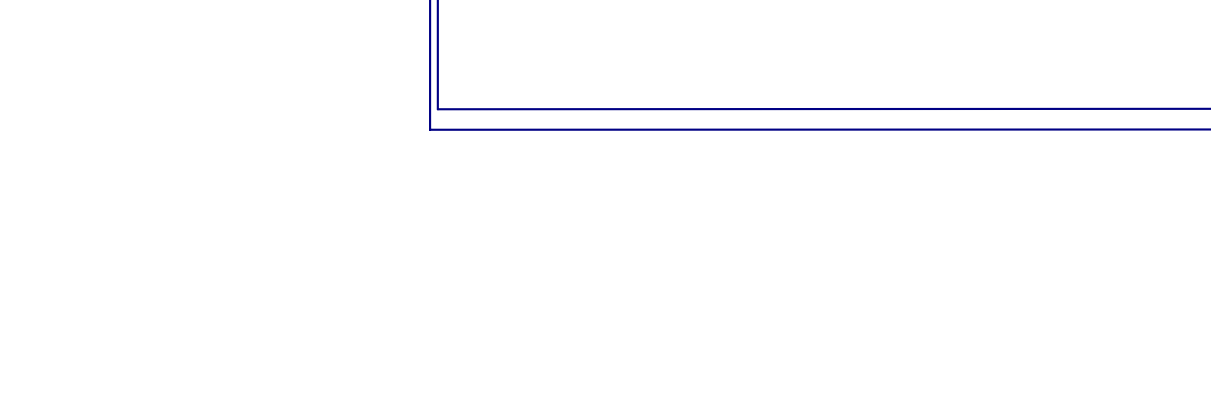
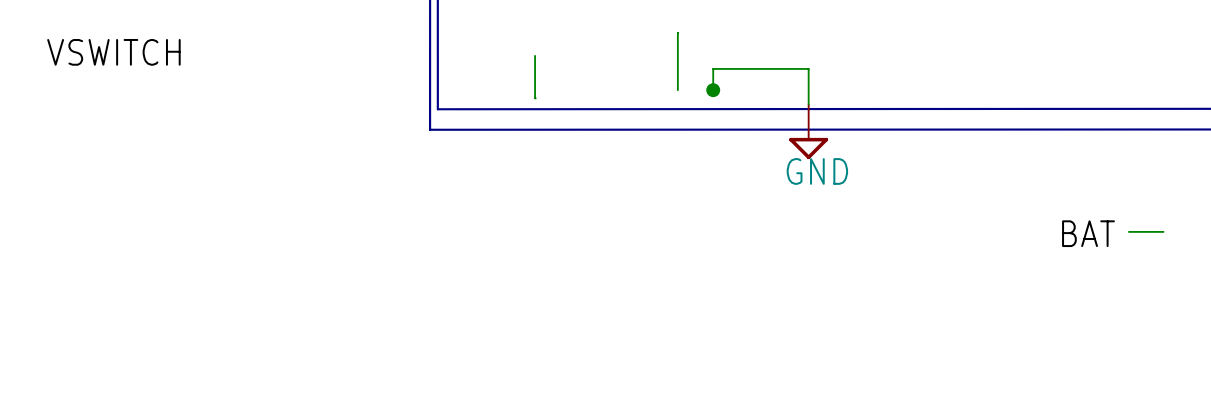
wire: none -> (678, 32) (677, 90)
label: none -> VSWITCH (113, 52)
wire: none -> (535, 55) (535, 98)
junction: none -> (713, 90)
wire: none -> (713, 93) (713, 68) (808, 68) (808, 104)
power symbol: none -> GND (808, 131)
wire: none -> (1128, 231) (1163, 231)
label: none -> BAT (1088, 233)

